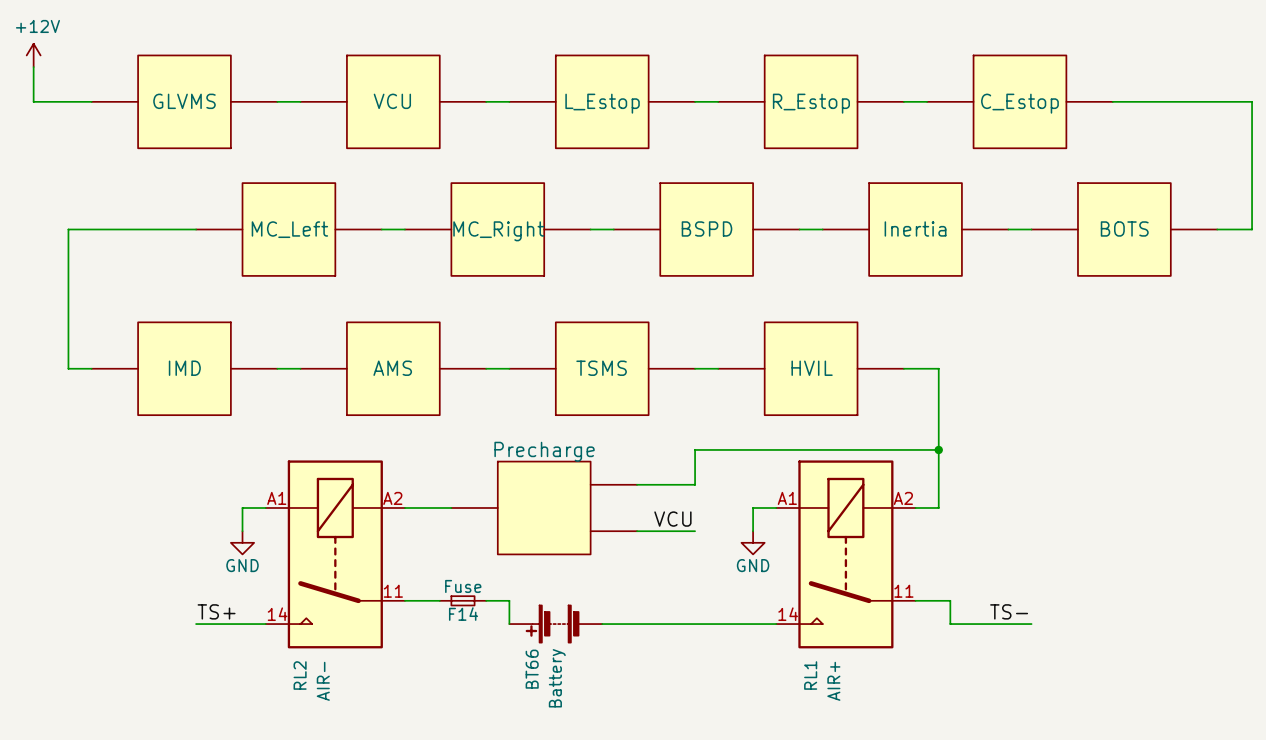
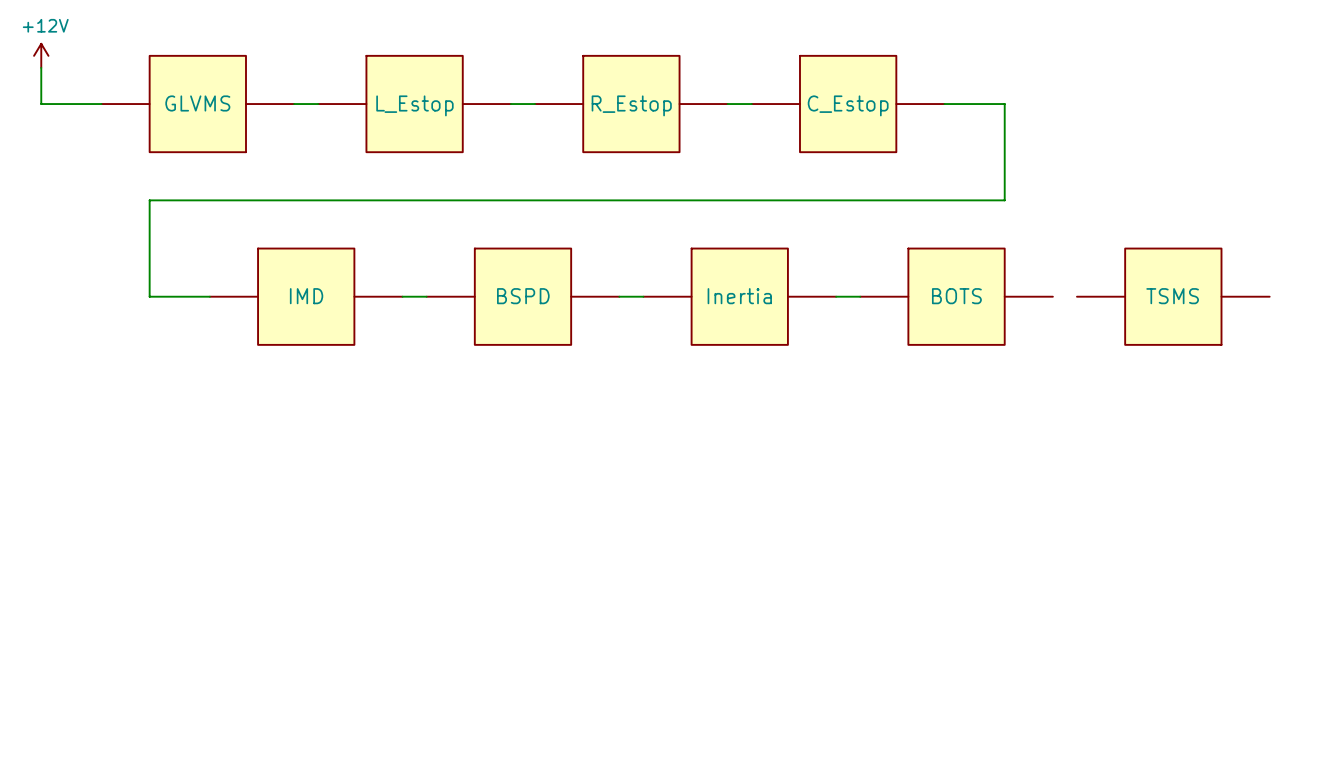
part value: VCU (392, 101) -> L_Estop (414, 105)
wire: none -> (968, 104) (1004, 104) (1004, 200) (149, 200) (149, 296) (209, 296)
part: C_Estop (1019, 101) -> none
wire: (1112, 101) (1252, 101) (1252, 229) (1217, 229) -> none
part value: L_Estop (602, 103) -> R_Estop (631, 105)
part value: R_Estop (811, 103) -> C_Estop (848, 105)
wire: (196, 229) (68, 229) (68, 368) (91, 368) -> none
part: MC_Left (288, 229) -> none
wire: (381, 229) (404, 229) -> (402, 296) (426, 296)
part: MC_Right (497, 229) -> none
wire: (590, 229) (613, 229) -> (619, 296) (643, 296)
part position: (706, 229) -> (522, 296)
wire: (799, 229) (822, 229) -> (836, 296) (860, 296)
part position: (915, 229) -> (739, 296)
wire: (1008, 229) (1031, 229) -> none
part position: (1124, 229) -> (956, 296)
part: none -> TSMS (1173, 296)
part position: (184, 368) -> (306, 296)
wire: (277, 368) (300, 368) -> none
part: AMS (393, 368) -> none
wire: (486, 368) (509, 368) -> none
part: TSMS (602, 368) -> none
wire: (695, 368) (718, 368) -> none
part: HVIL (811, 368) -> none
wire: (903, 368) (938, 368) (938, 507) (915, 507) -> none
wire: (938, 449) (695, 449) (695, 484) (637, 484) -> none
junction: (938, 449) -> none
wire: (265, 507) (242, 507) (242, 531) -> none
wire: (404, 507) (451, 507) -> none
part: Precharge (544, 507) -> none
wire: (776, 507) (753, 507) (753, 531) -> none
label: VCU (672, 519) -> none
wire: (637, 531) (695, 531) -> none
power symbol: GND (242, 542) -> none
power symbol: GND (753, 542) -> none
RL2: AIR- (335, 554) -> none
RL1: AIR+ (845, 554) -> none
wire: (404, 600) (439, 600) -> none
F14: Fuse (462, 600) -> none
wire: (486, 600) (509, 600) (509, 624) -> none
wire: (915, 600) (950, 600) (950, 624) (1031, 624) -> none
label: TS+ (216, 611) -> none
label: TS- (1009, 611) -> none
wire: (196, 624) (265, 624) -> none
BT66: Battery (555, 624) -> none
wire: (602, 624) (776, 624) -> none

